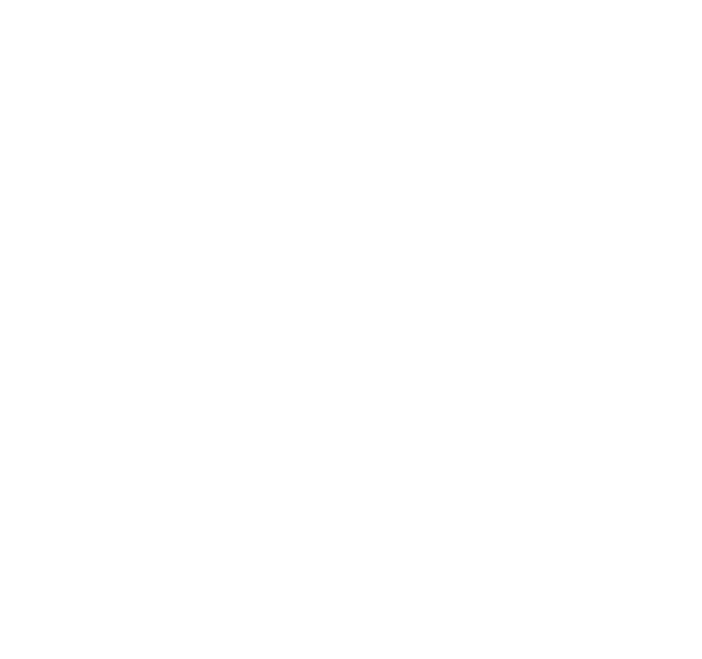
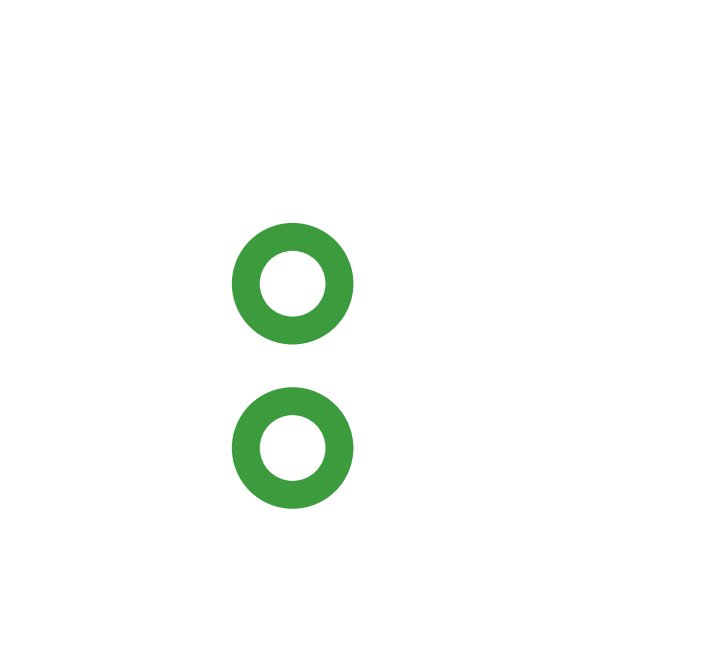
part: none -> (292, 365)

